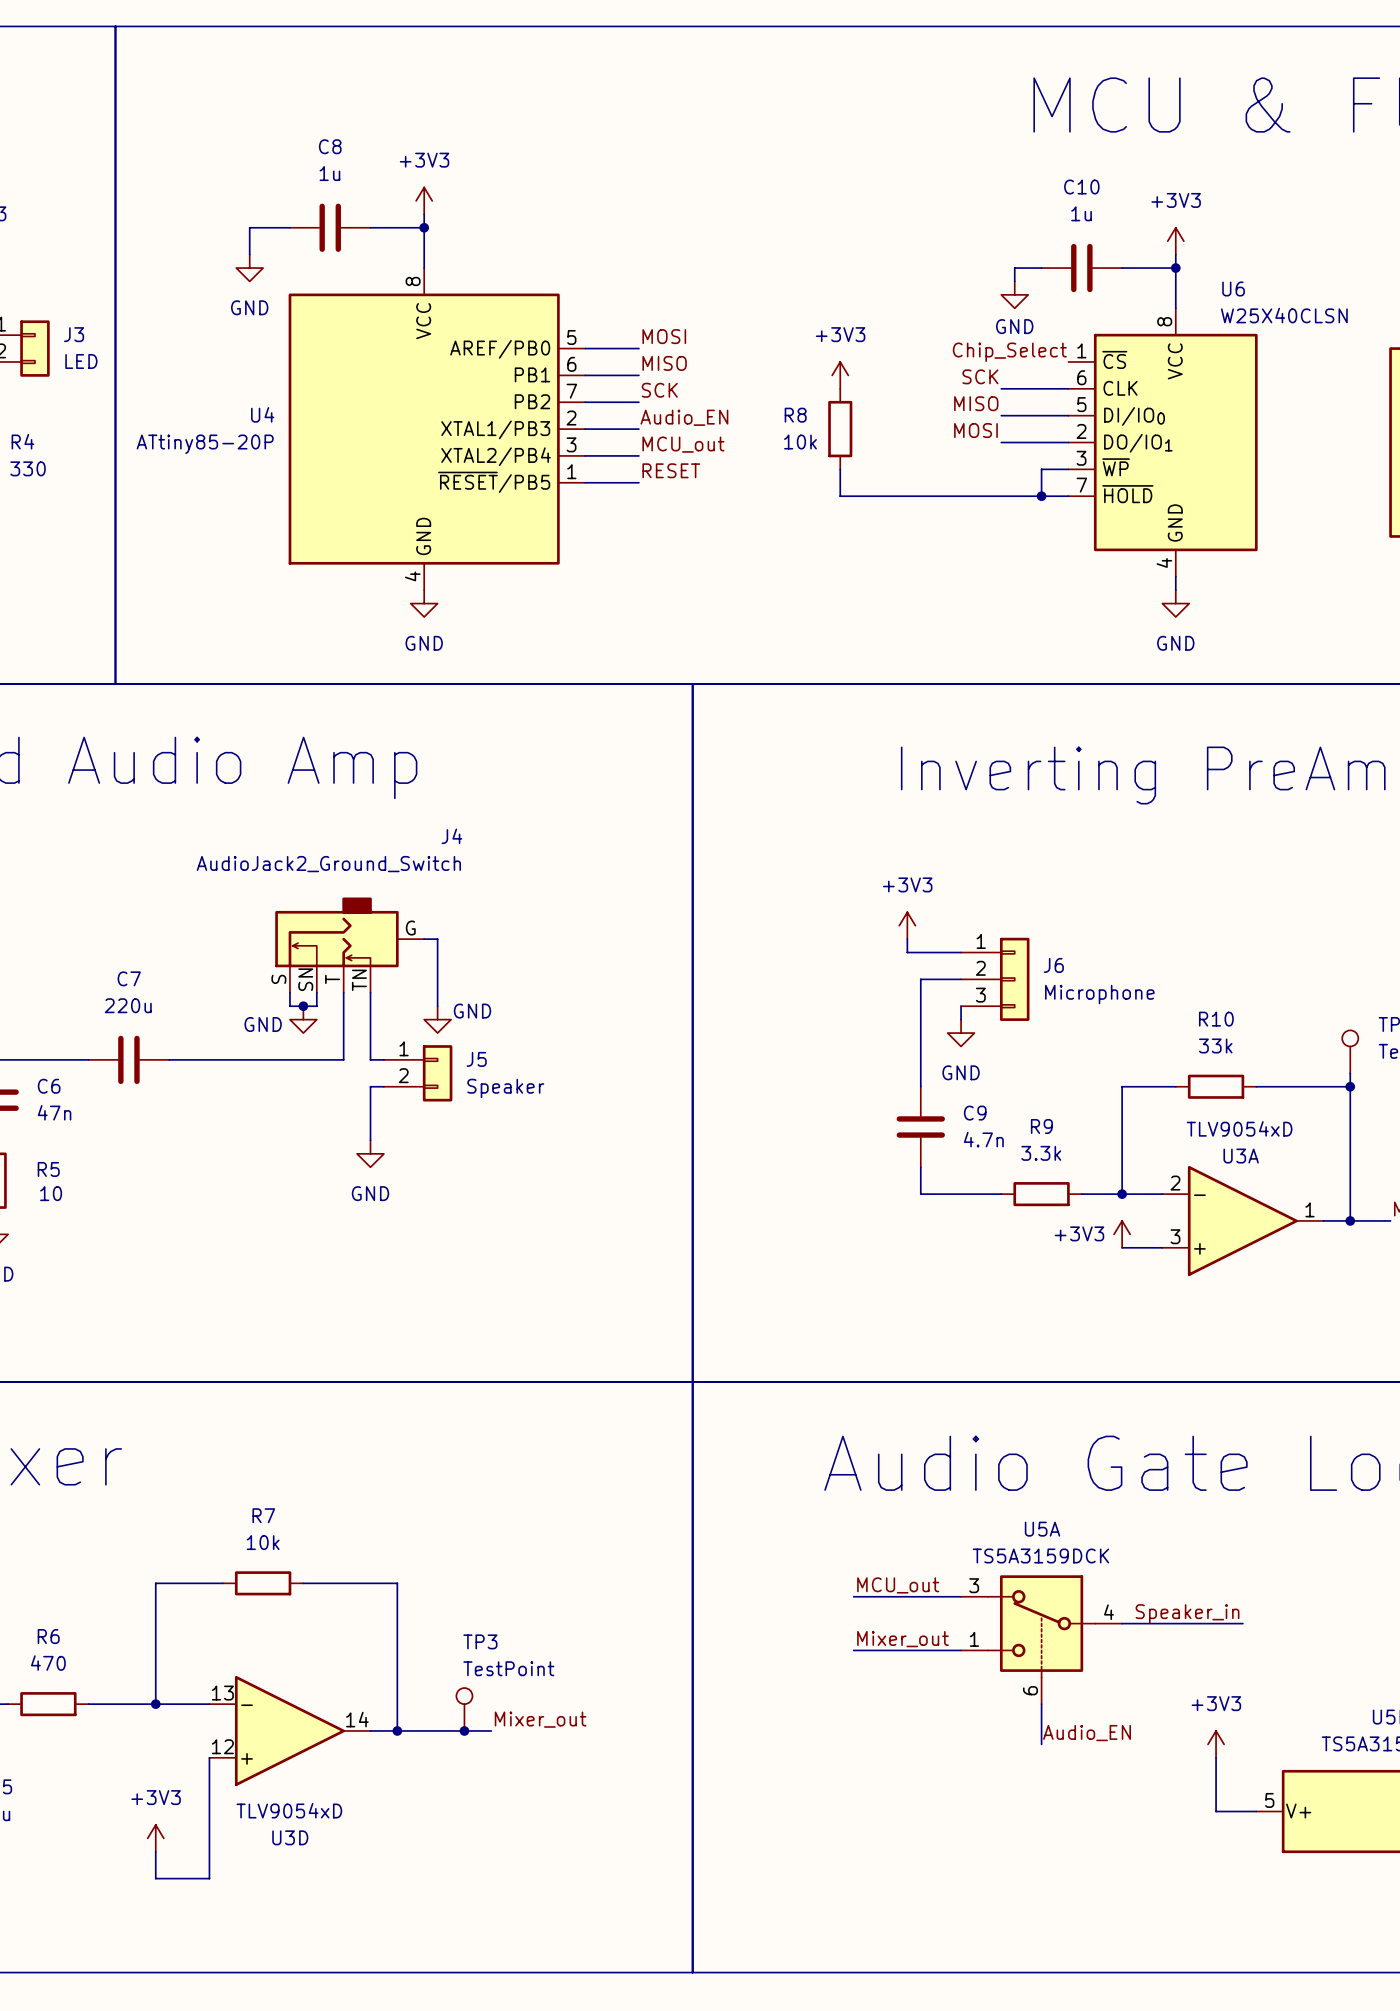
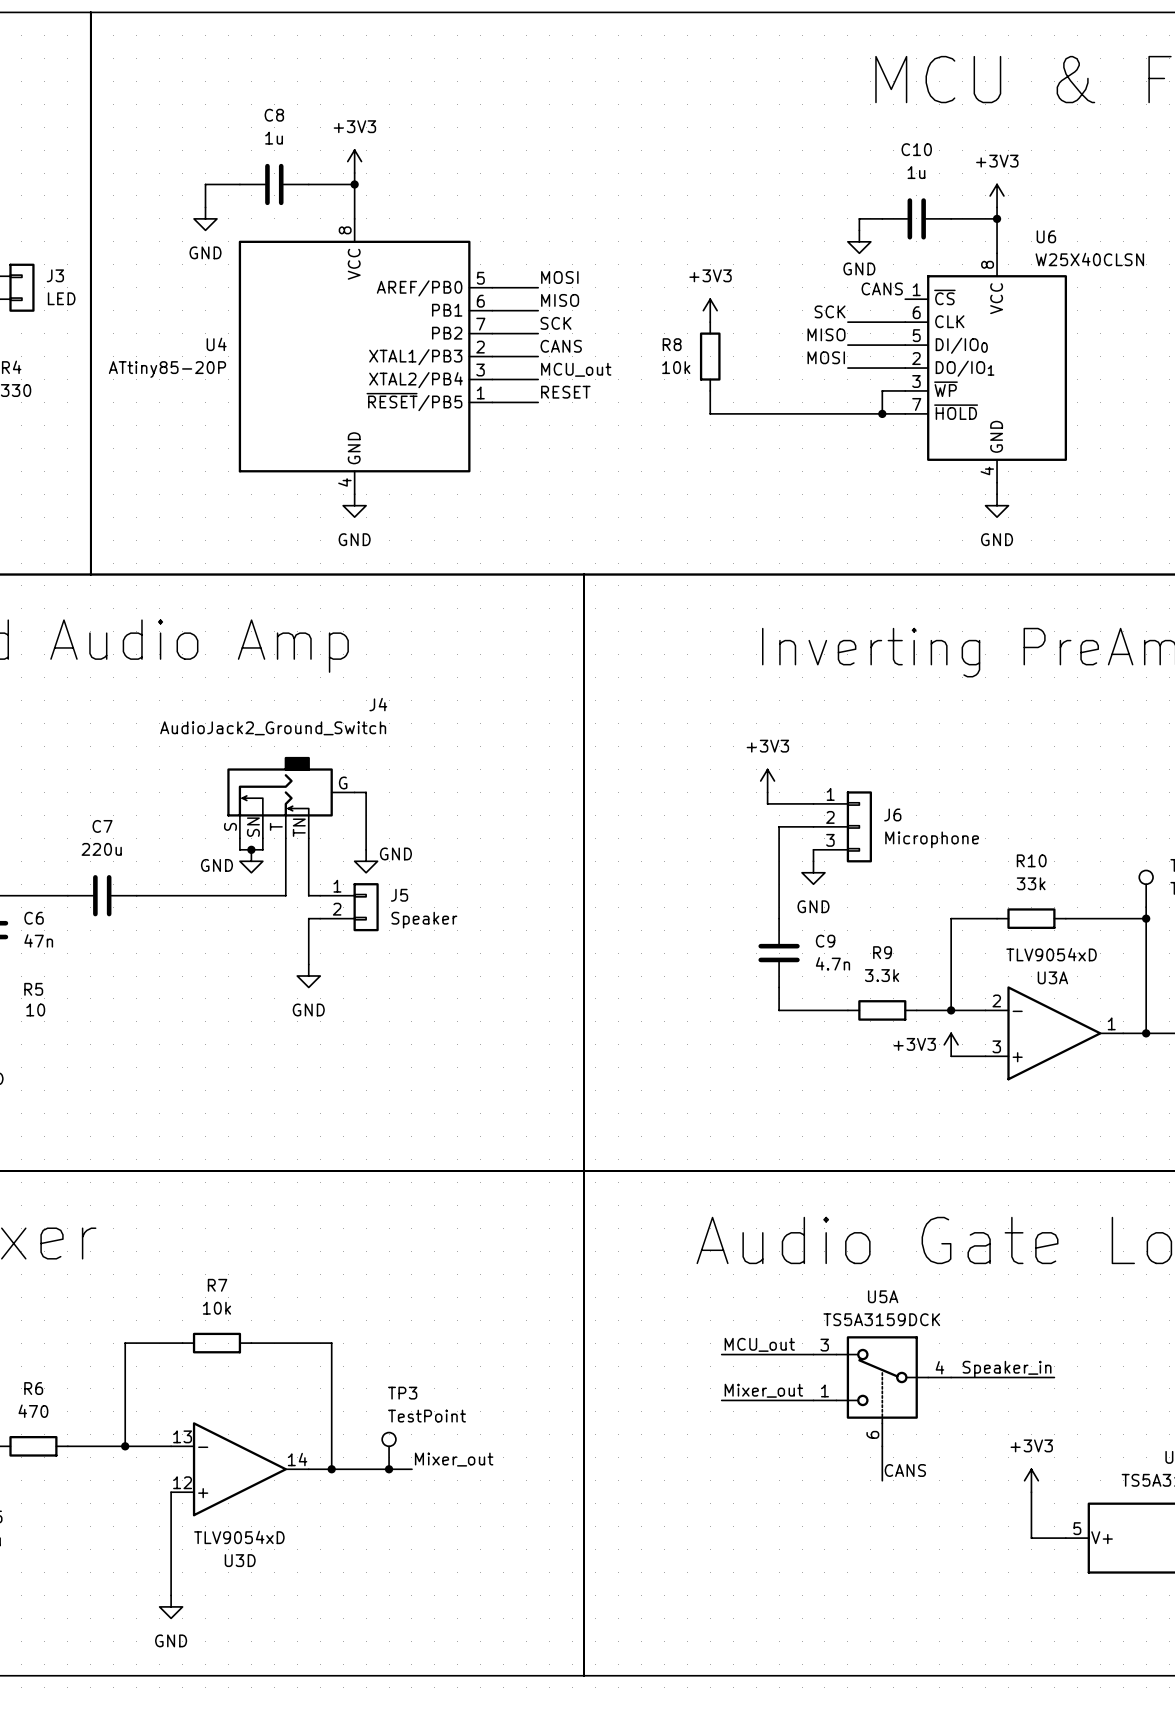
label: Chip_Select (1009, 352) -> CANS (882, 288)
label: Audio_EN (684, 417) -> CANS (561, 346)
label: Audio_EN (1087, 1733) -> CANS (905, 1470)
power symbol: +3V3 (155, 1838) -> none
wire: (155, 1851) (155, 1878) (209, 1878) -> none
power symbol: none -> GND (171, 1606)

